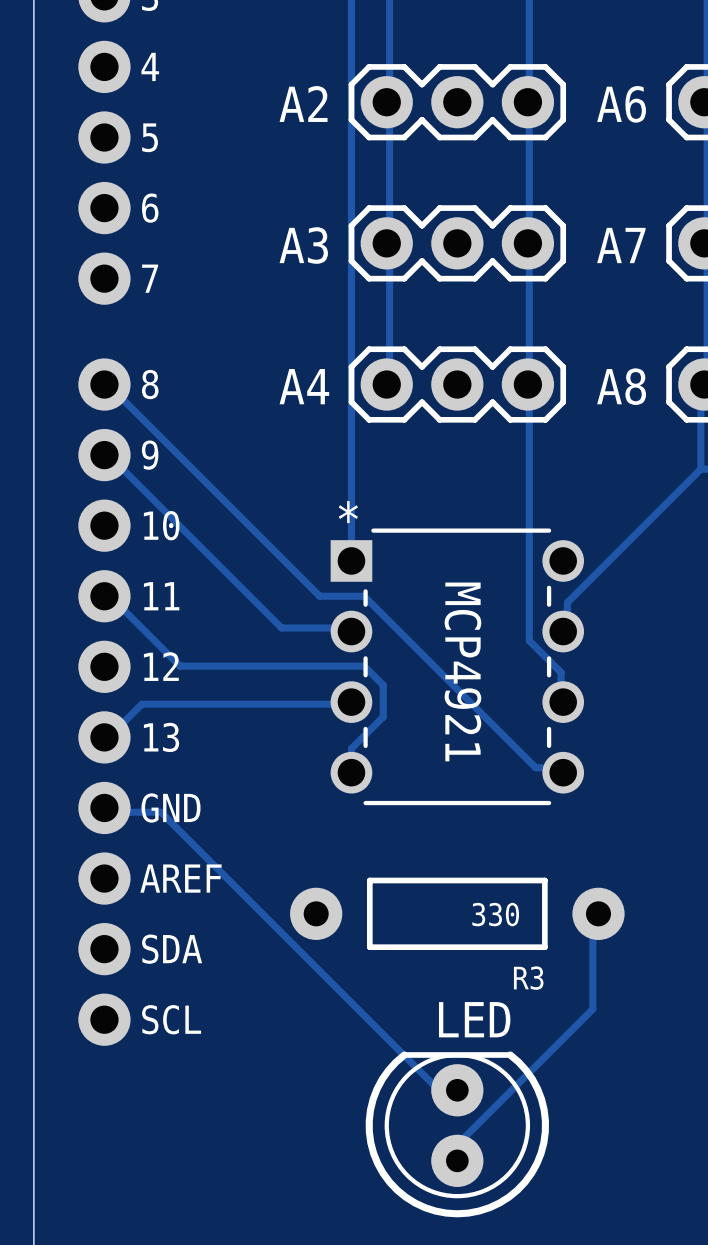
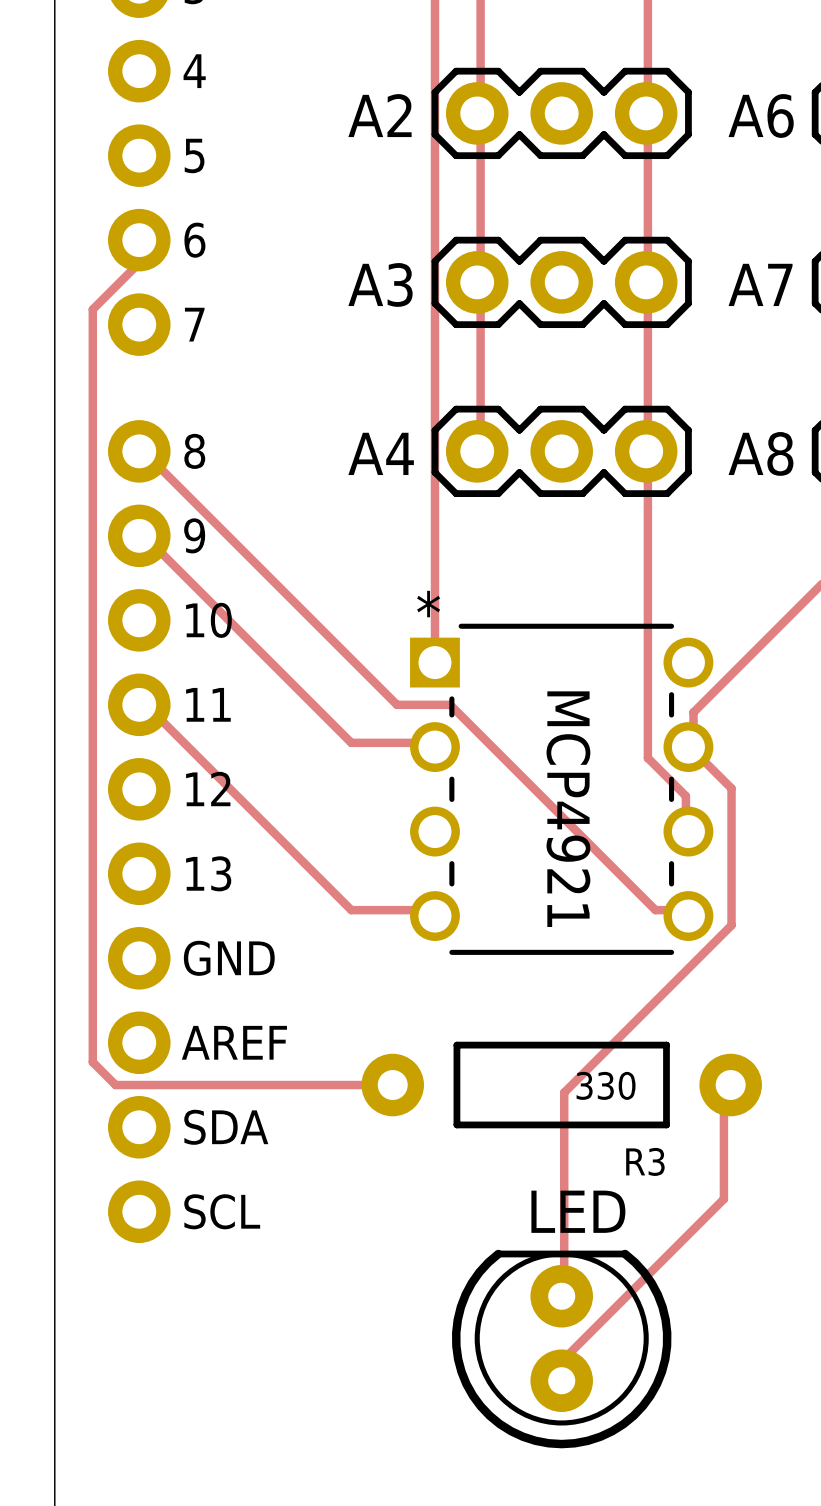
track: none -> (139, 240) (138, 263) (92, 309) (92, 1062) (115, 1085) (392, 1085)
track: (179, 666) (364, 666) (383, 685) (383, 716) (351, 748) (351, 767) -> (229, 788) (351, 910) (434, 910)
track: (351, 702) (351, 704) (141, 704) (110, 735) (104, 737) -> none
track: (104, 807) (110, 812) (160, 812) (434, 1085) (453, 1085) (457, 1090) -> (688, 747) (731, 788) (731, 925) (564, 1092) (564, 1290) (561, 1296)

